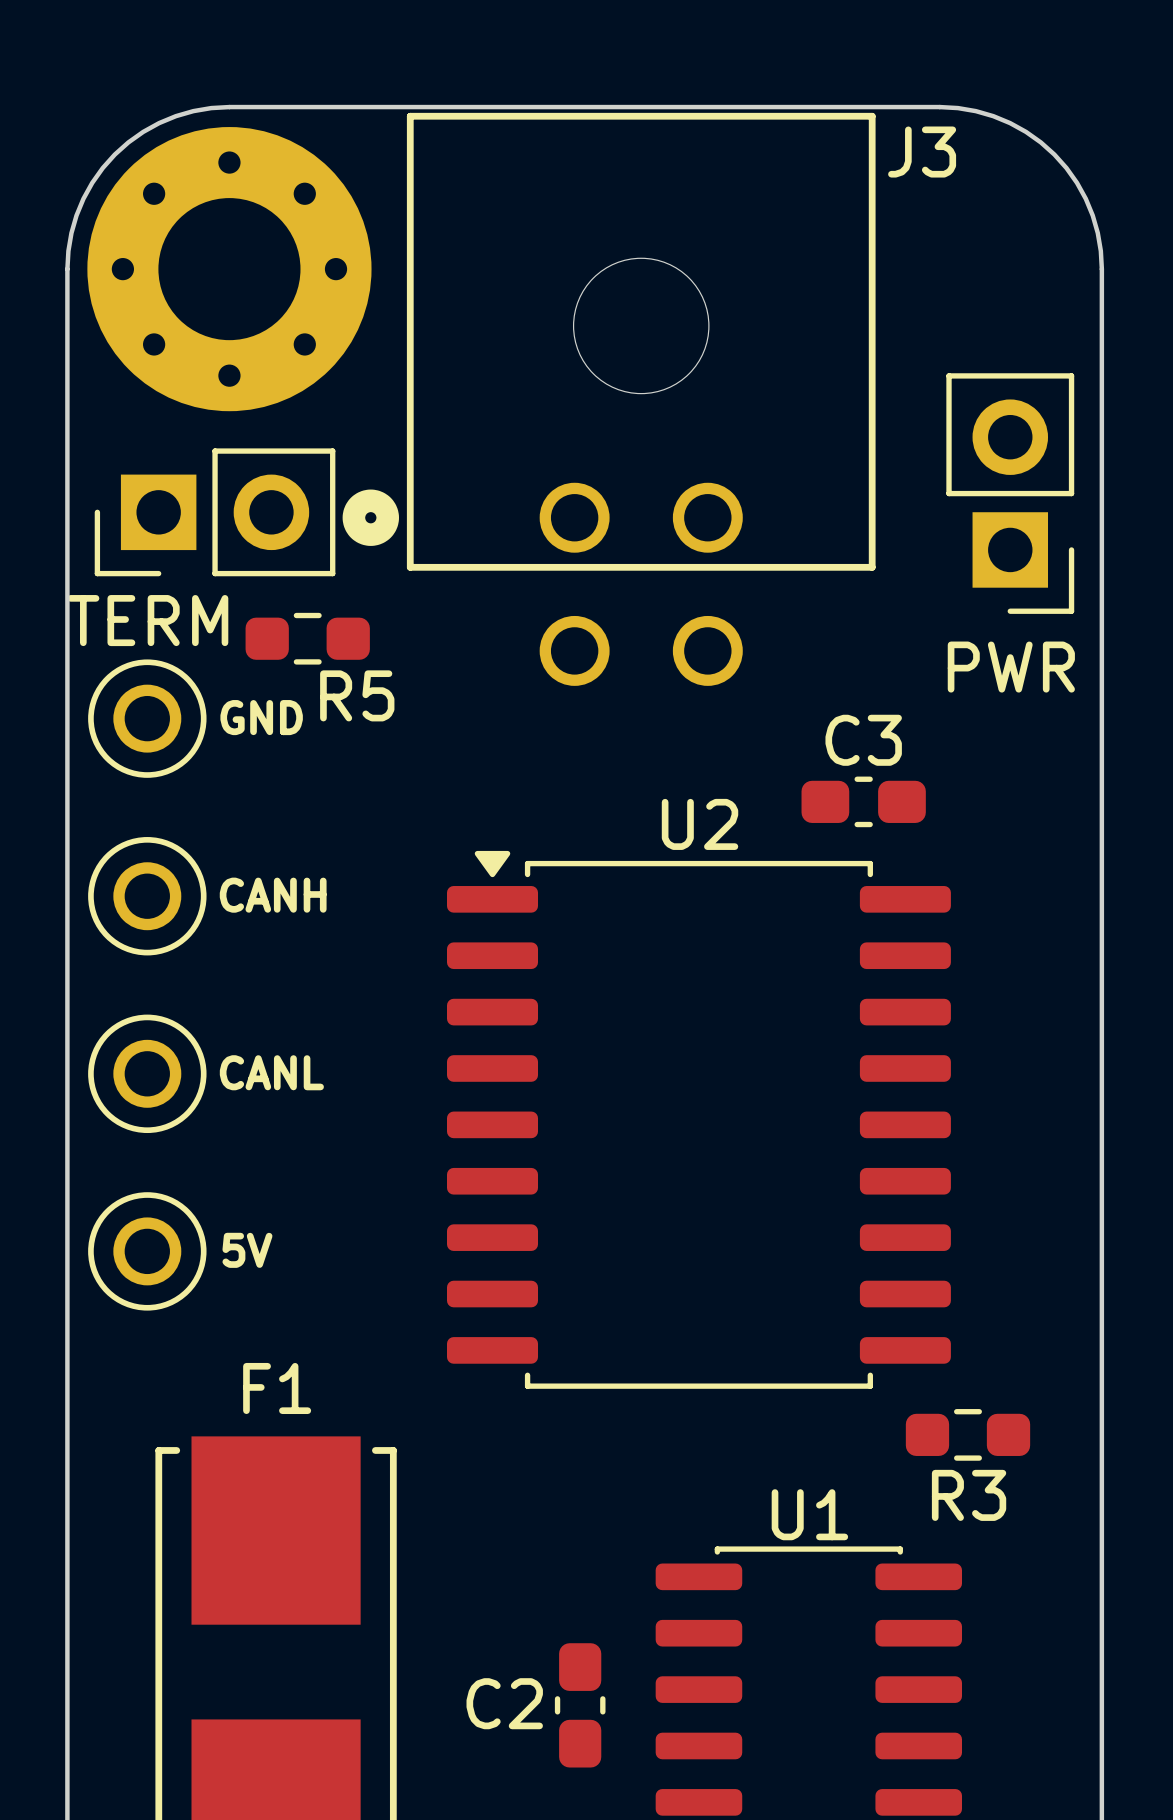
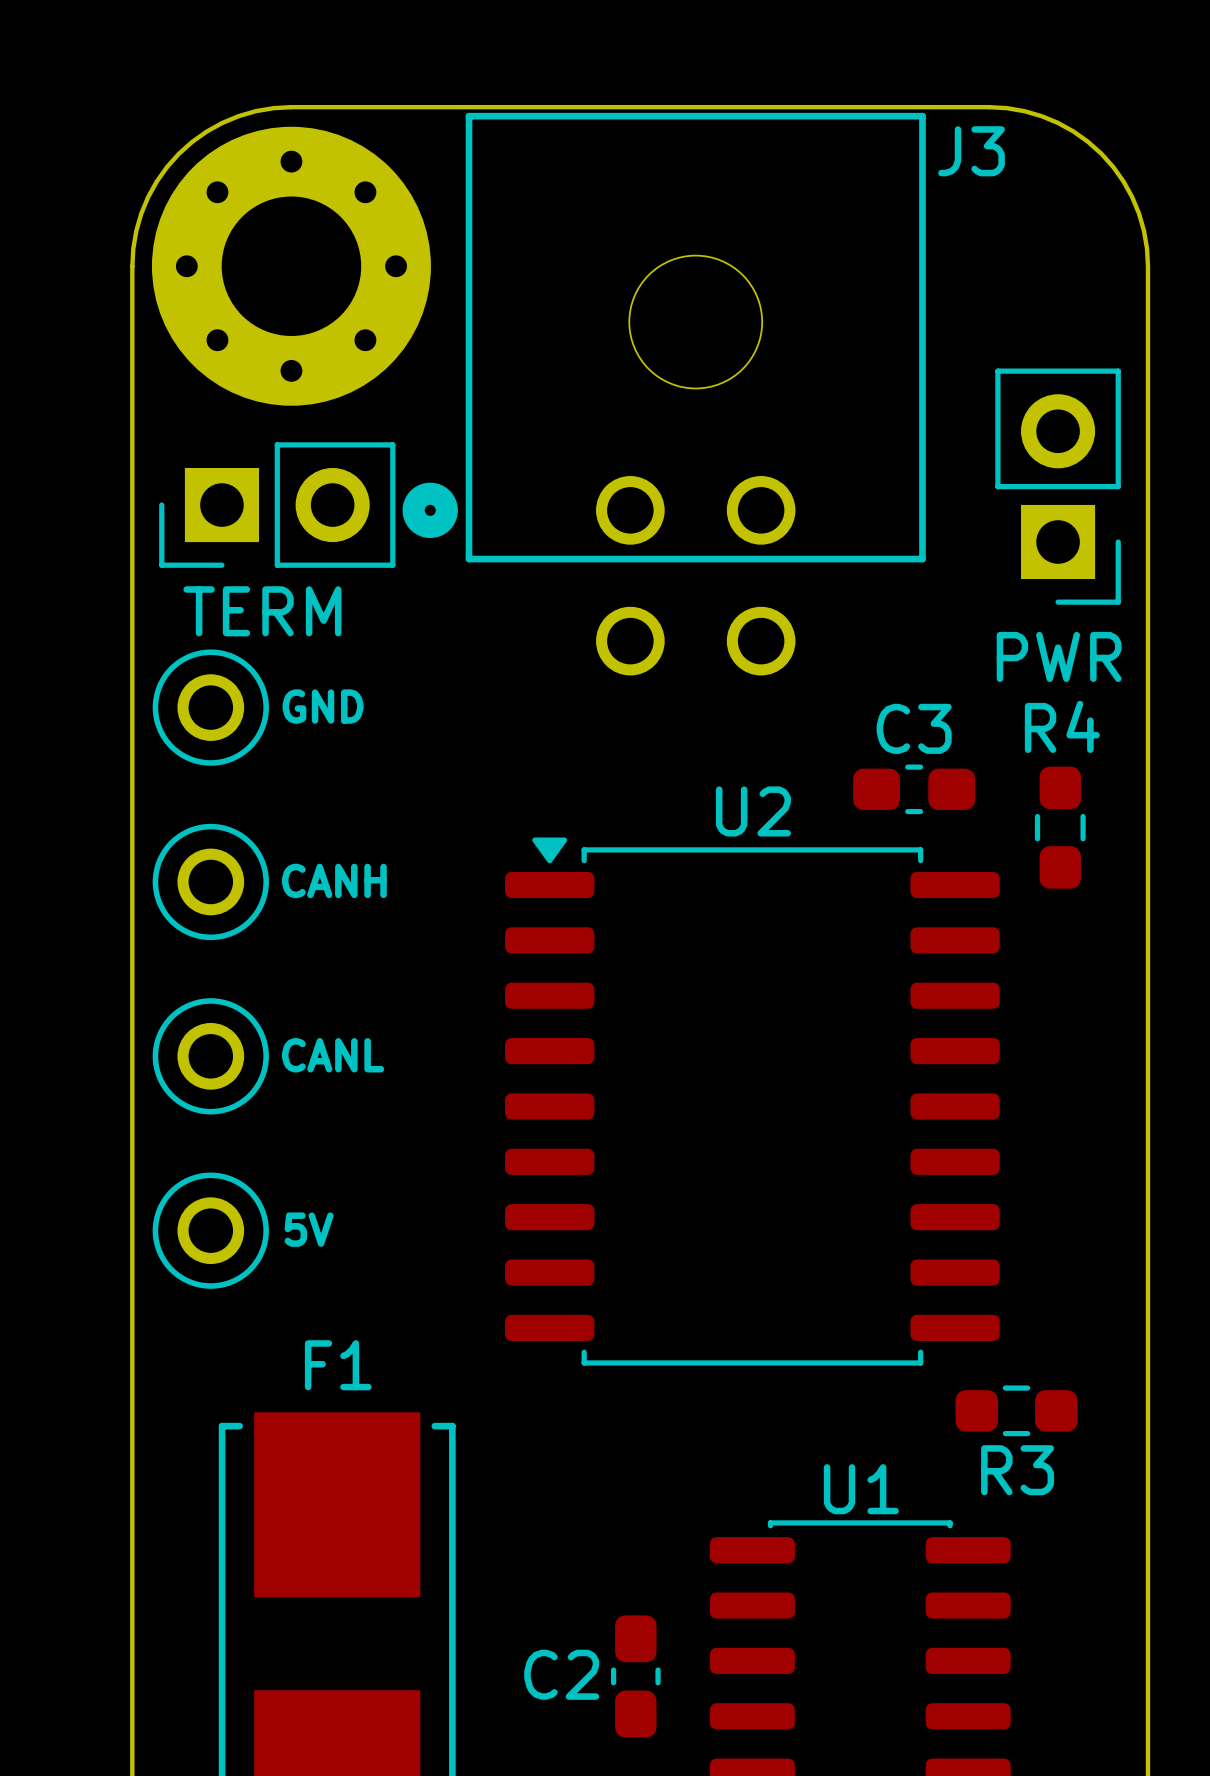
TERM name position: TERM (147, 620) -> TERM (262, 611)
R5: (307, 638) -> none
R4: none -> (1060, 827)

